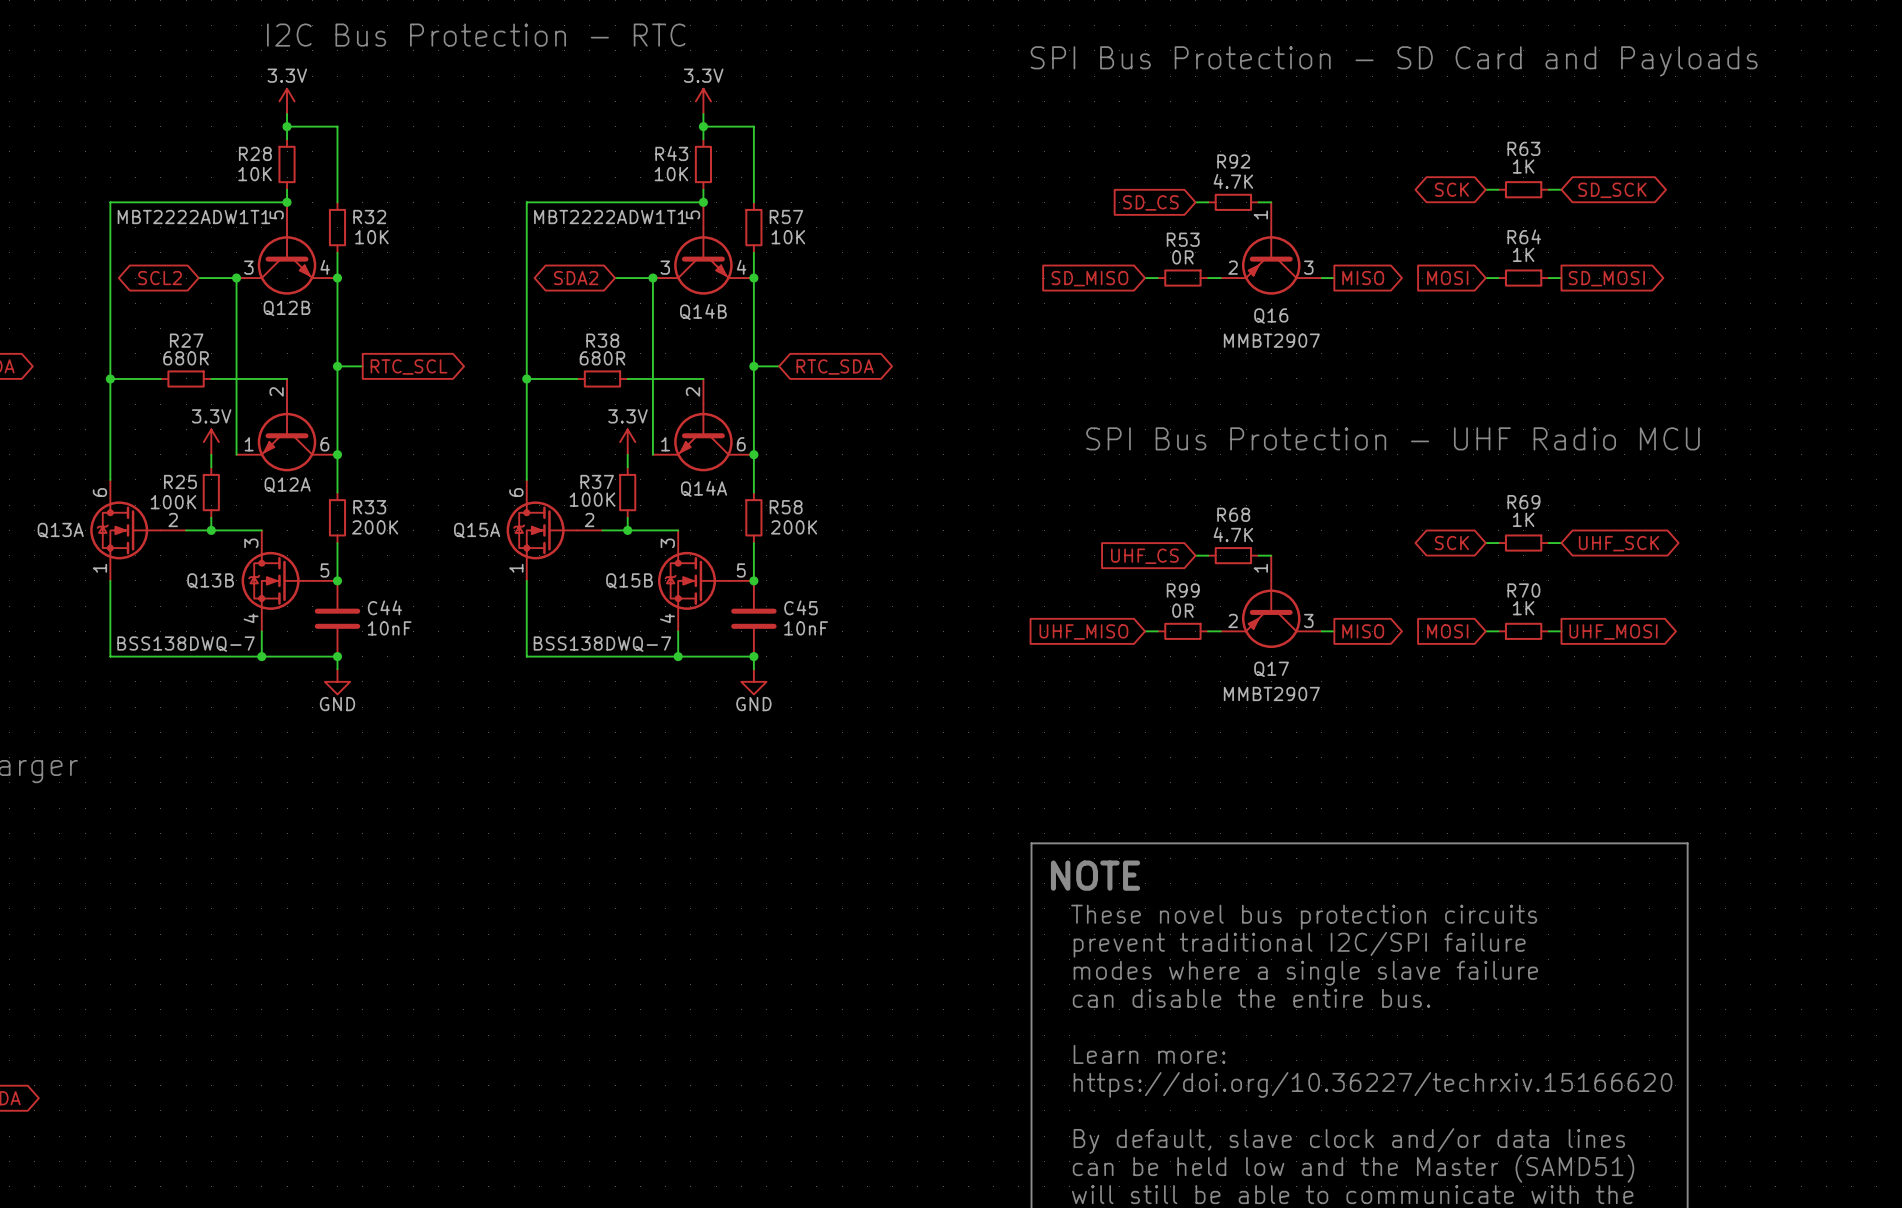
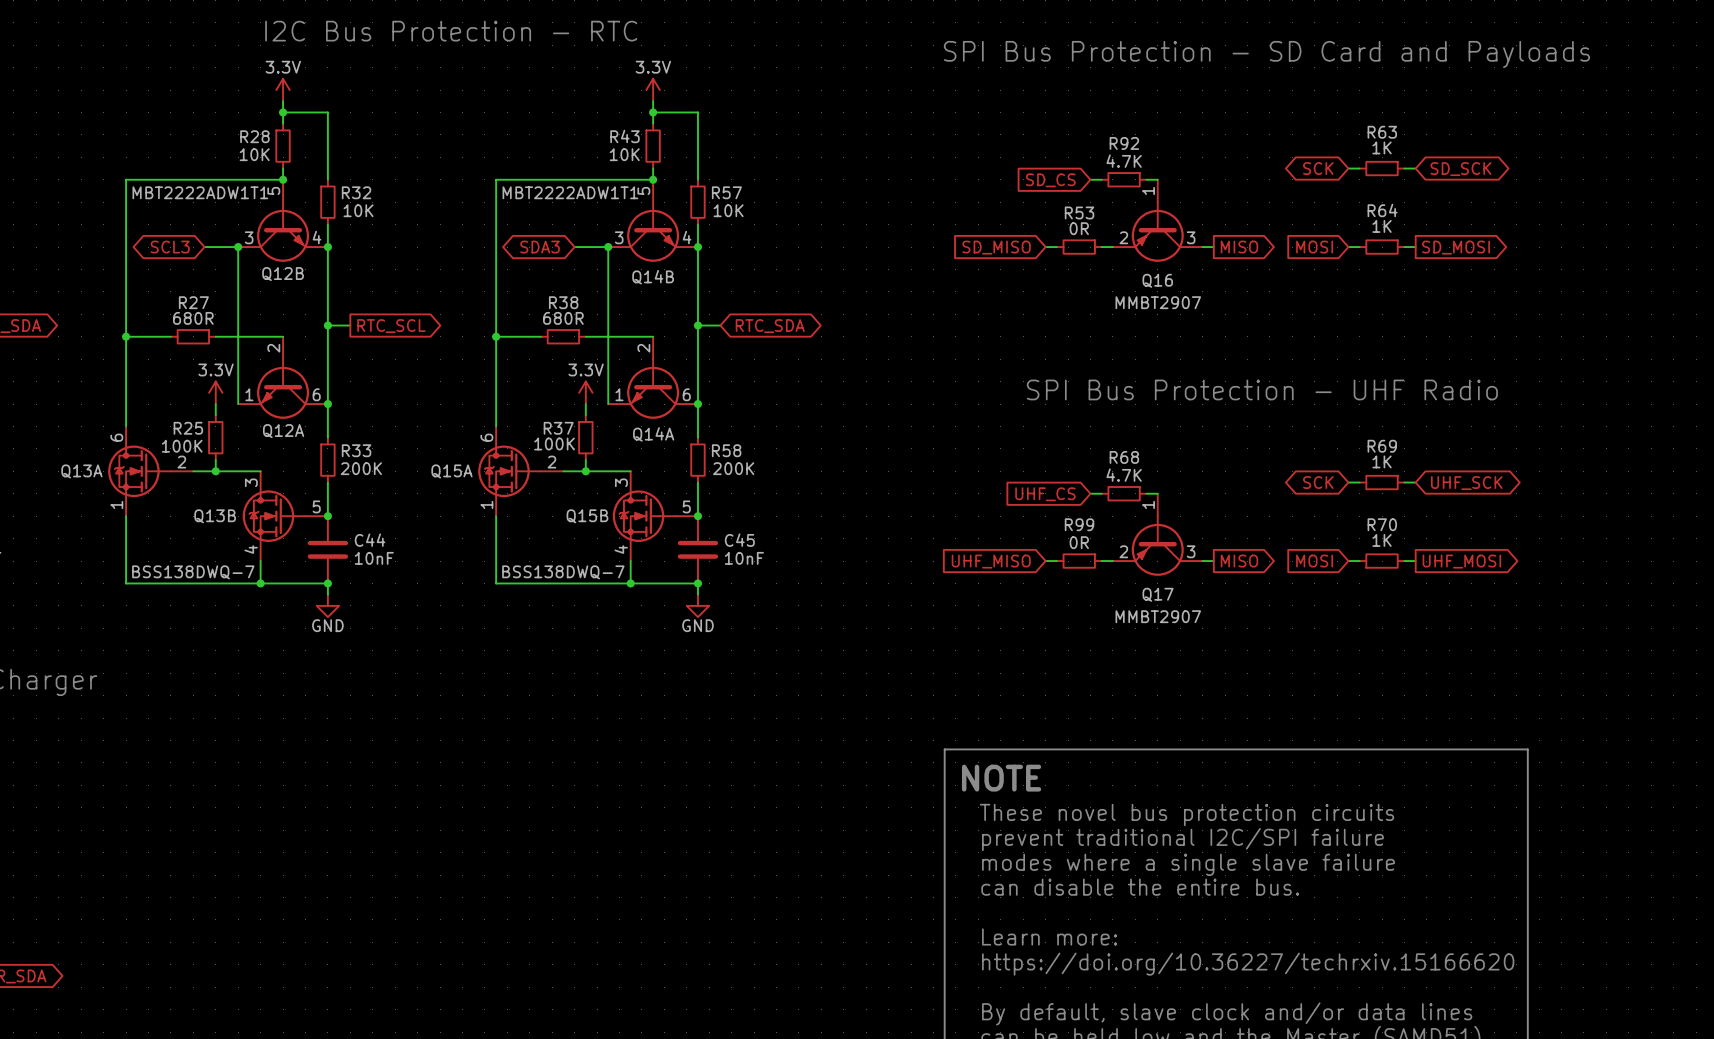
global label: SCL2 (160, 278) -> SCL3 (170, 247)
global label: SDA2 (576, 278) -> SDA3 (540, 247)
text: SPI Bus Protection - UHF Radio MCU (1392, 438) -> SPI Bus Protection - UHF Radio (1262, 389)

